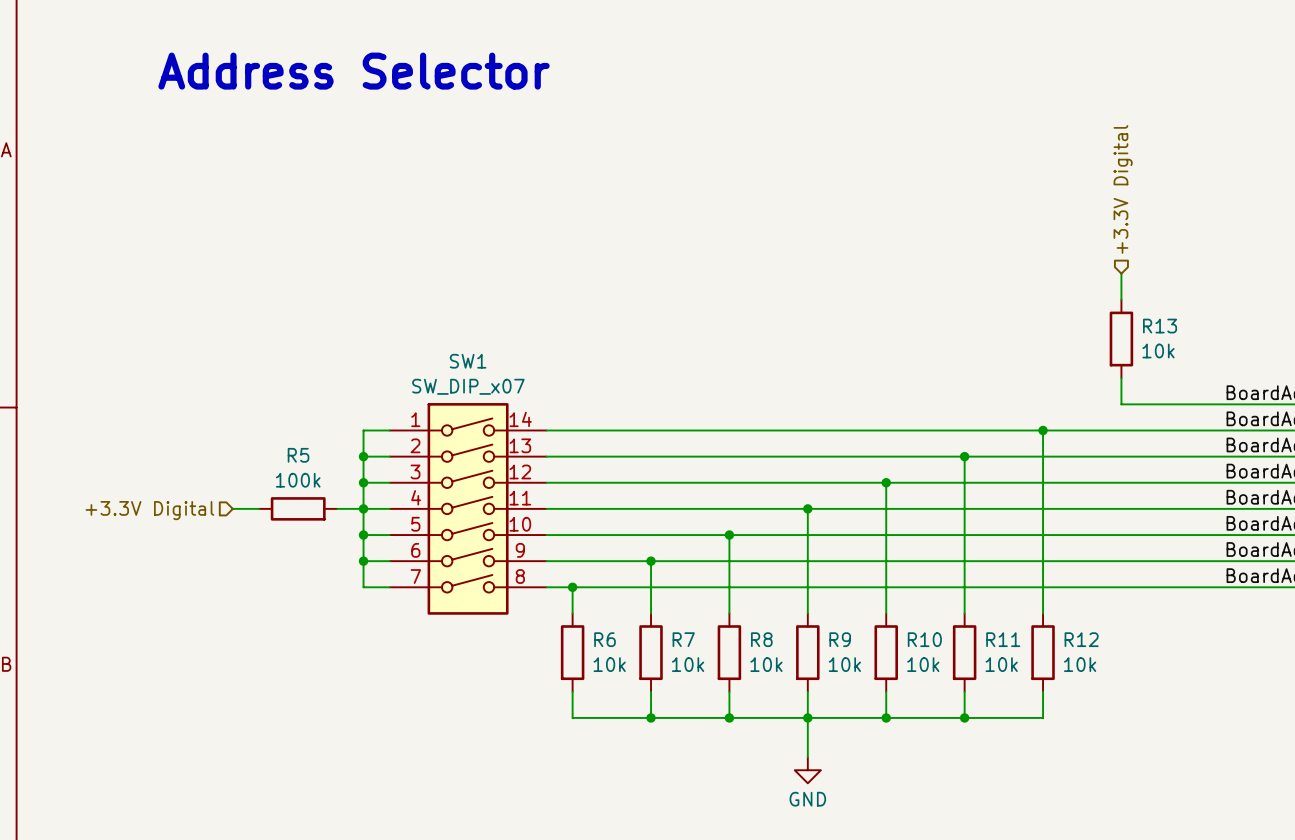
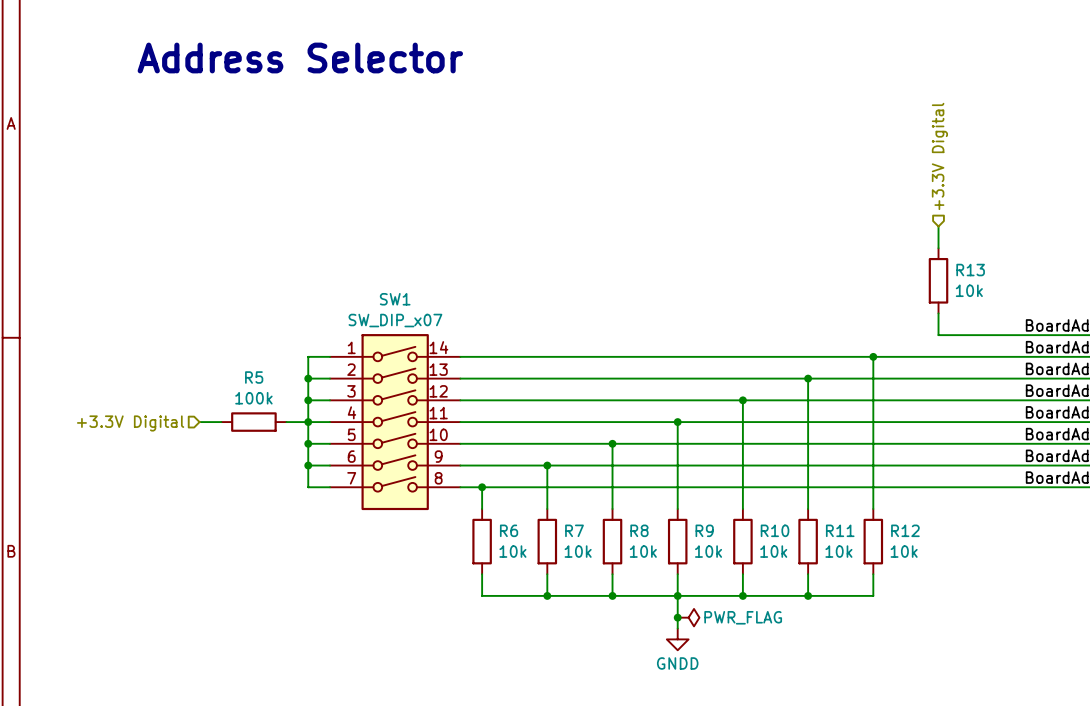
junction: none -> (677, 617)
power symbol: none -> PWR_FLAG (688, 617)
power symbol: GND (807, 770) -> GNDD (677, 639)

